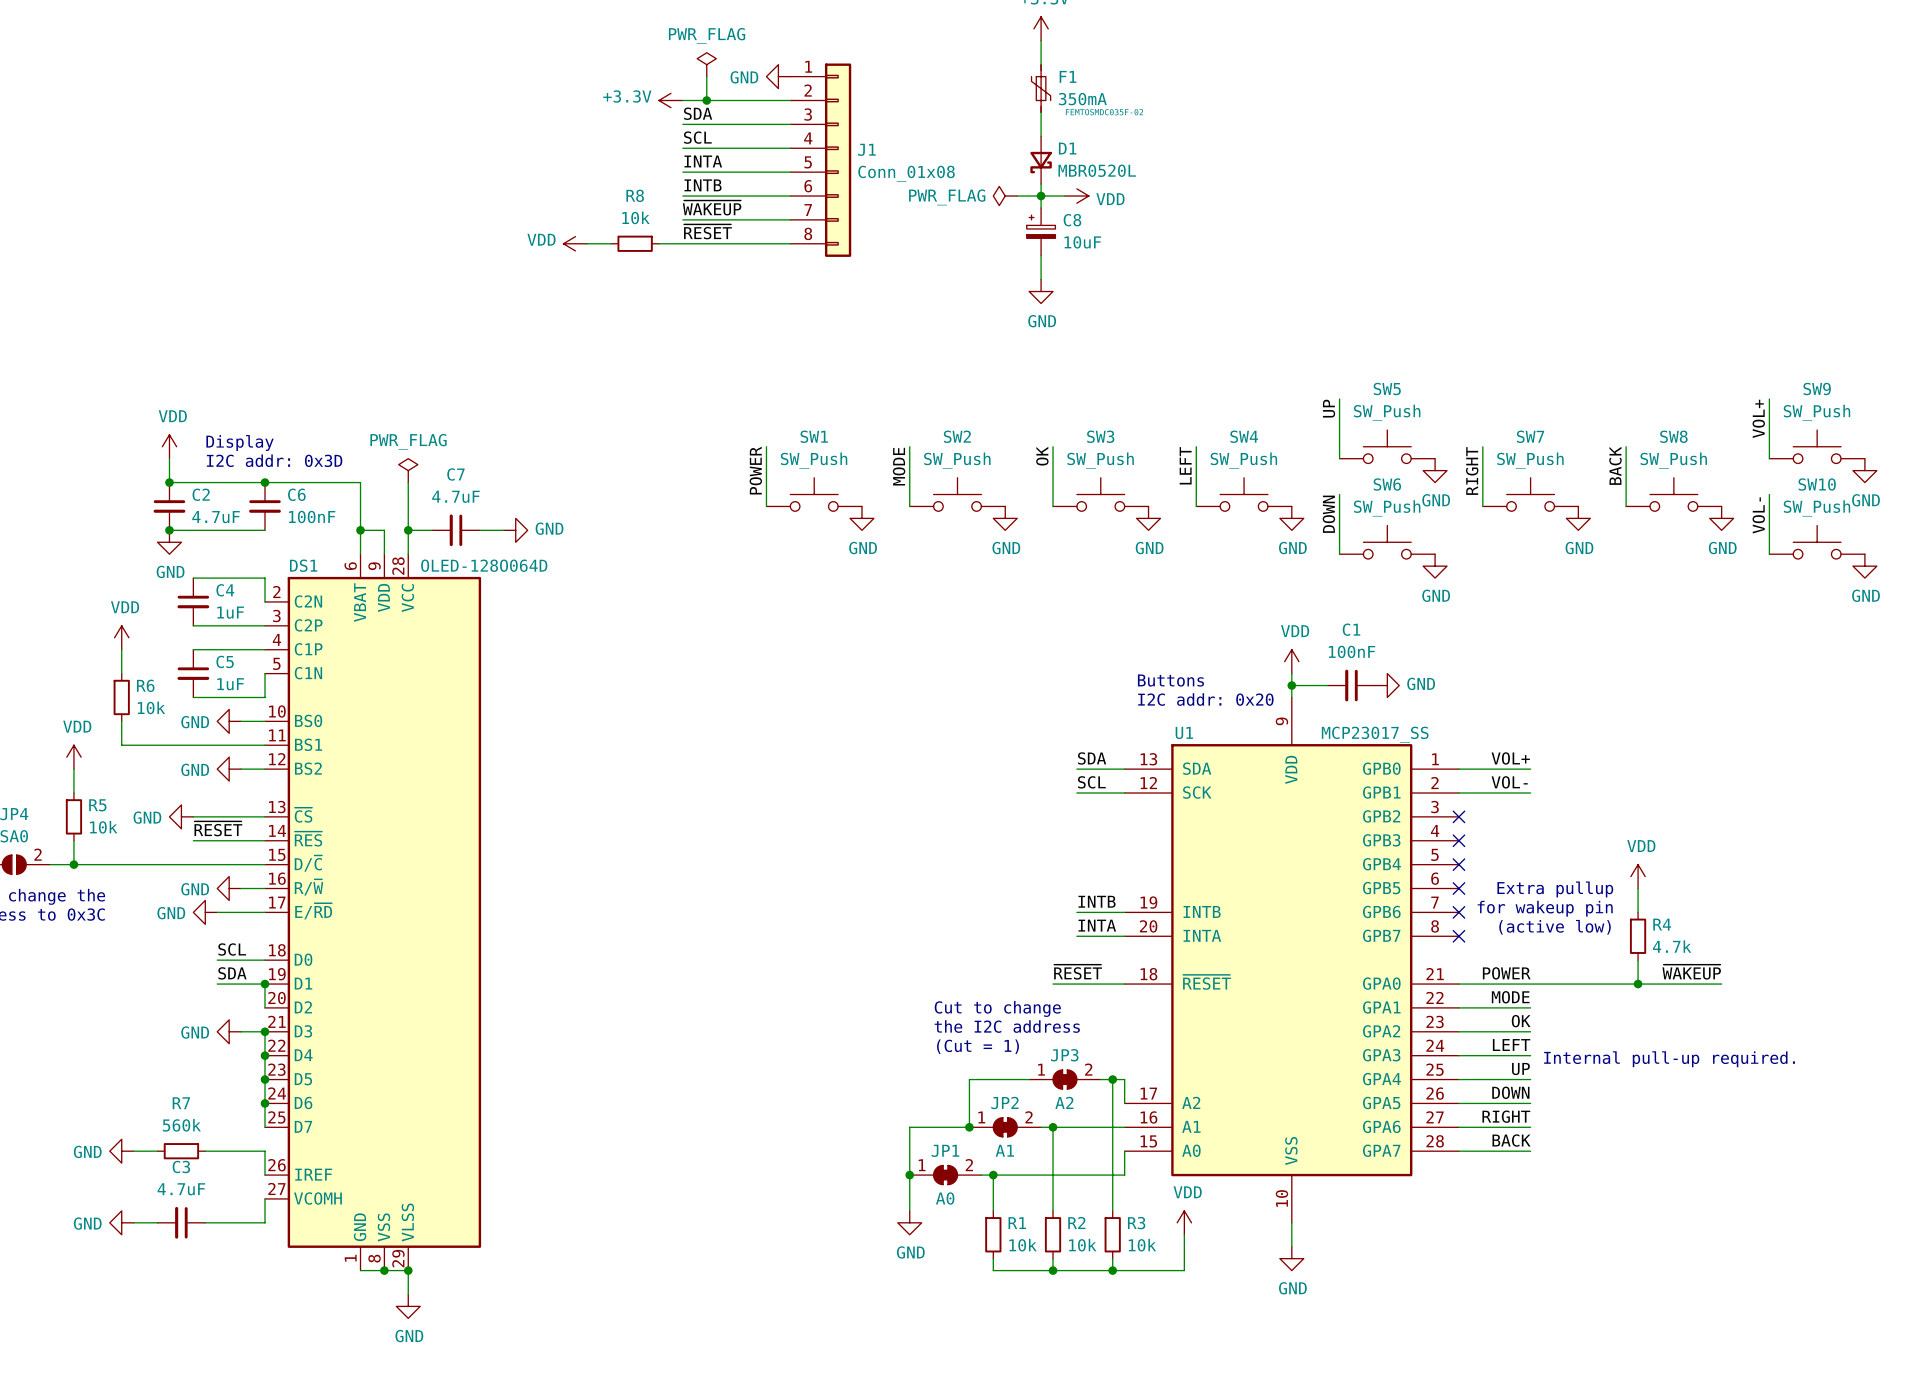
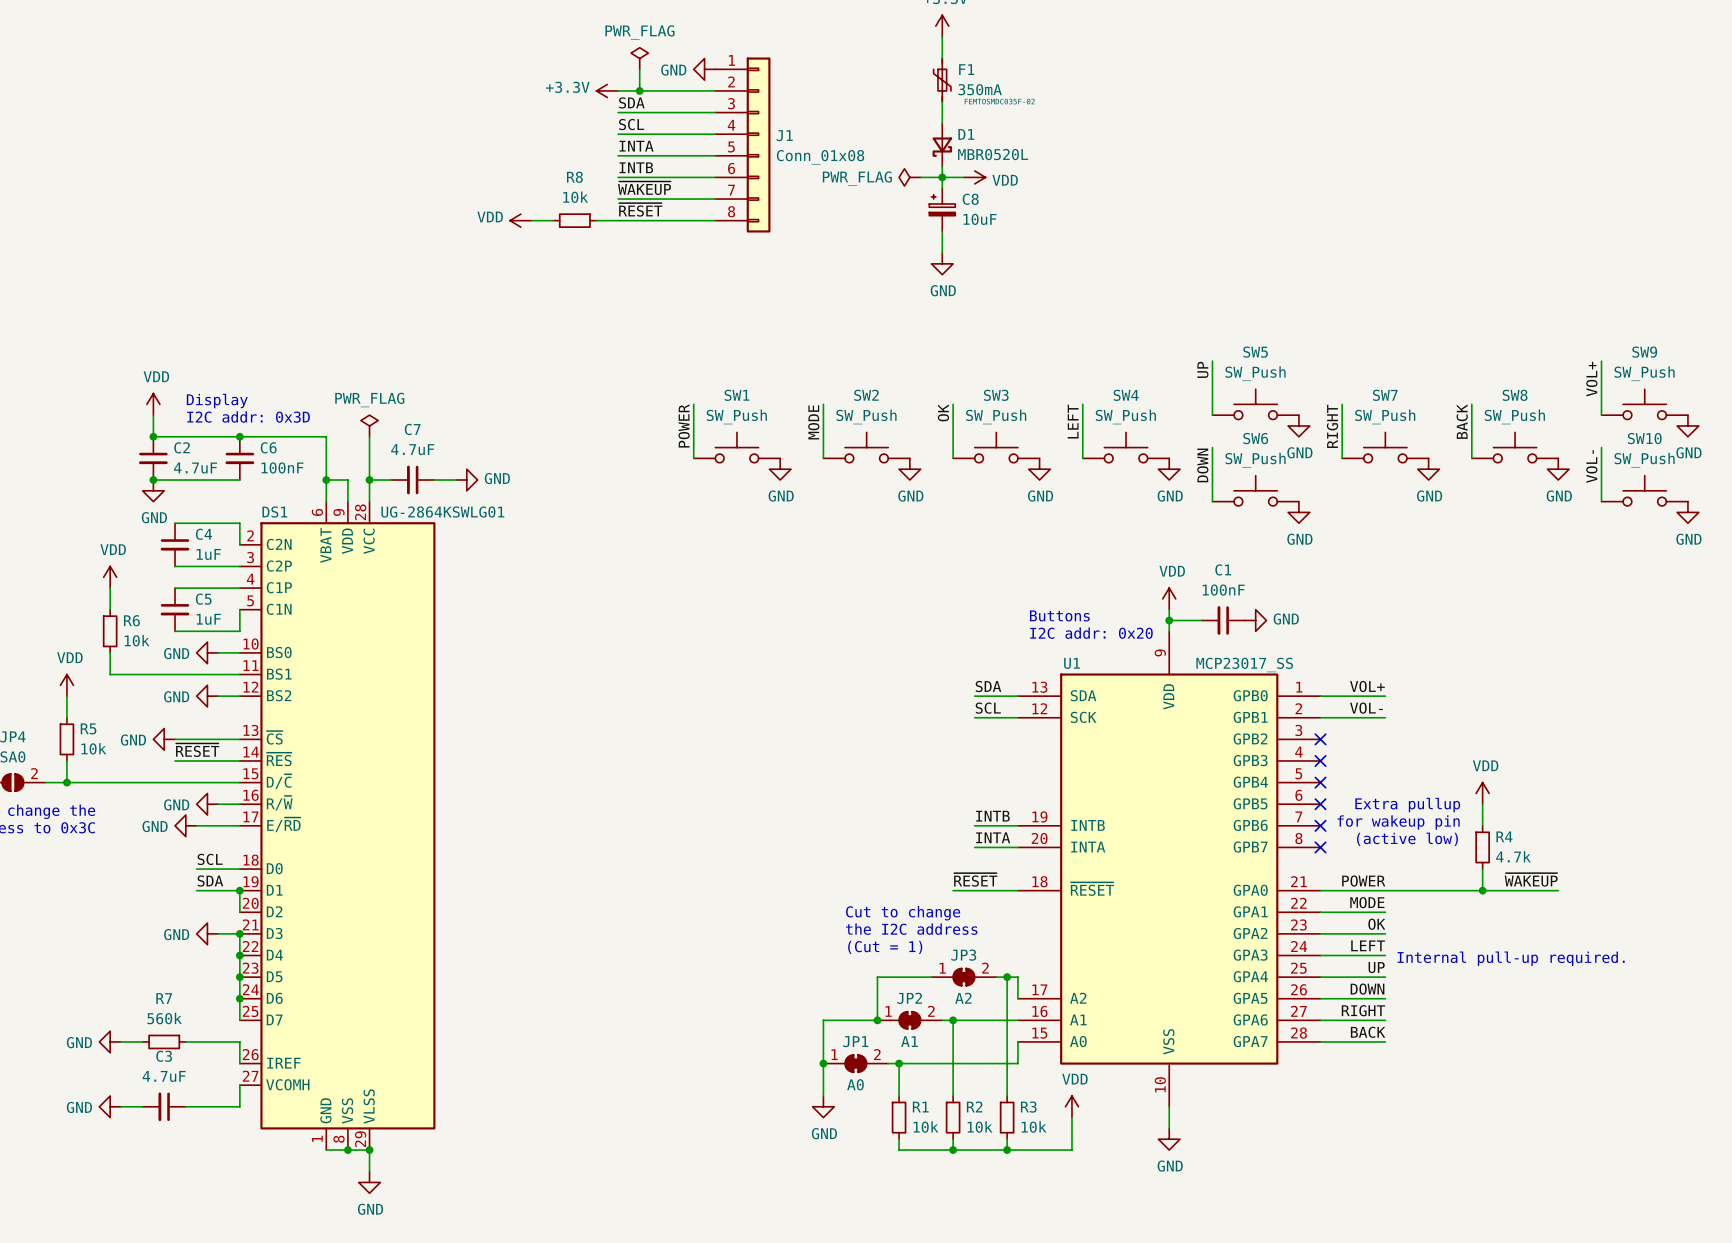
DS1 value: OLED-128O064D (484, 565) -> UG-2864KSWLG01 (442, 512)

